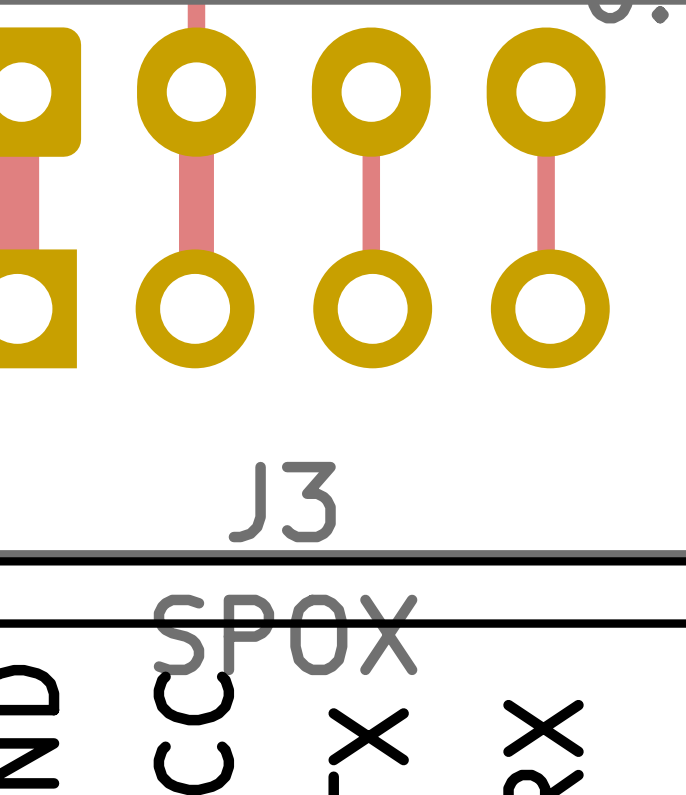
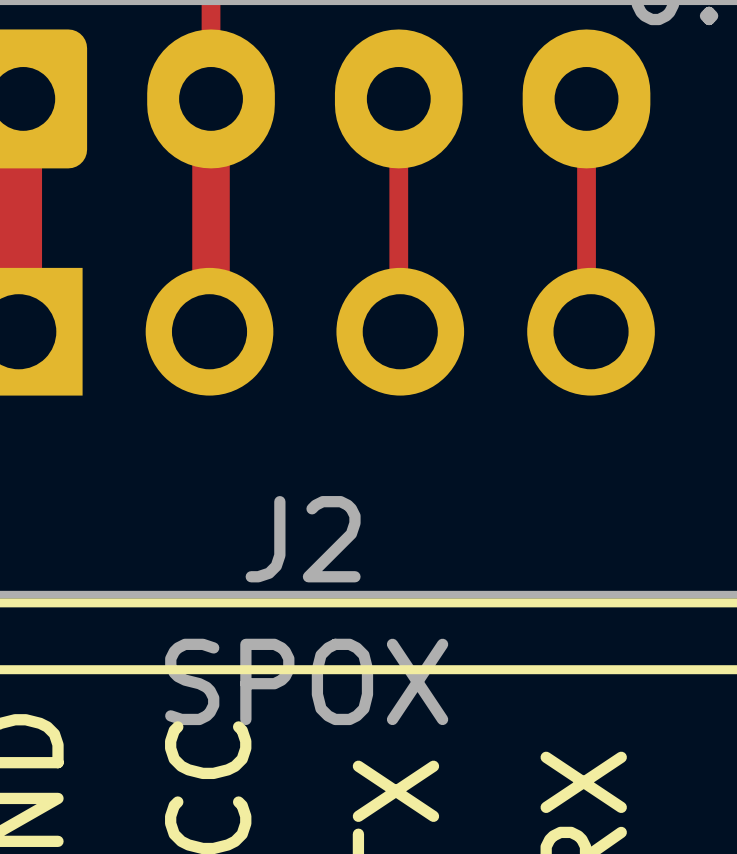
J3 name: J3 (282, 502) -> J2 (303, 539)

